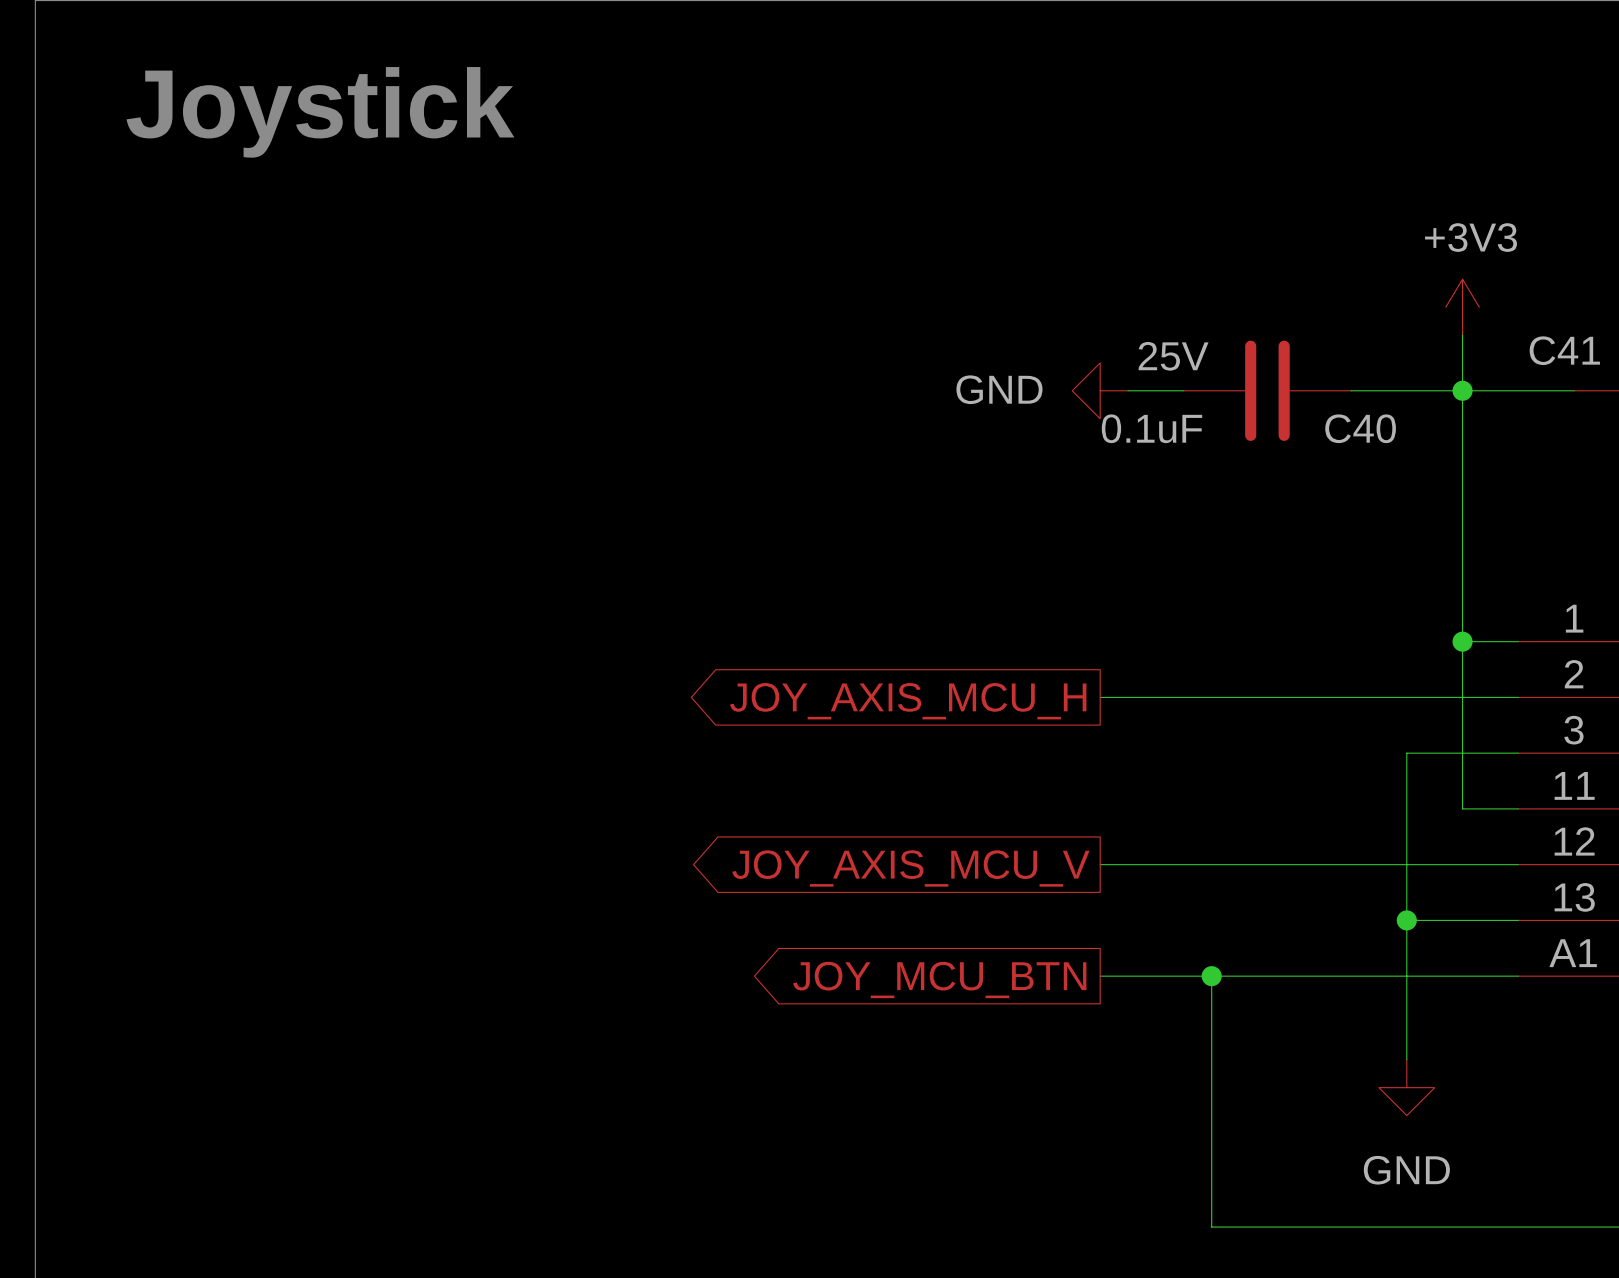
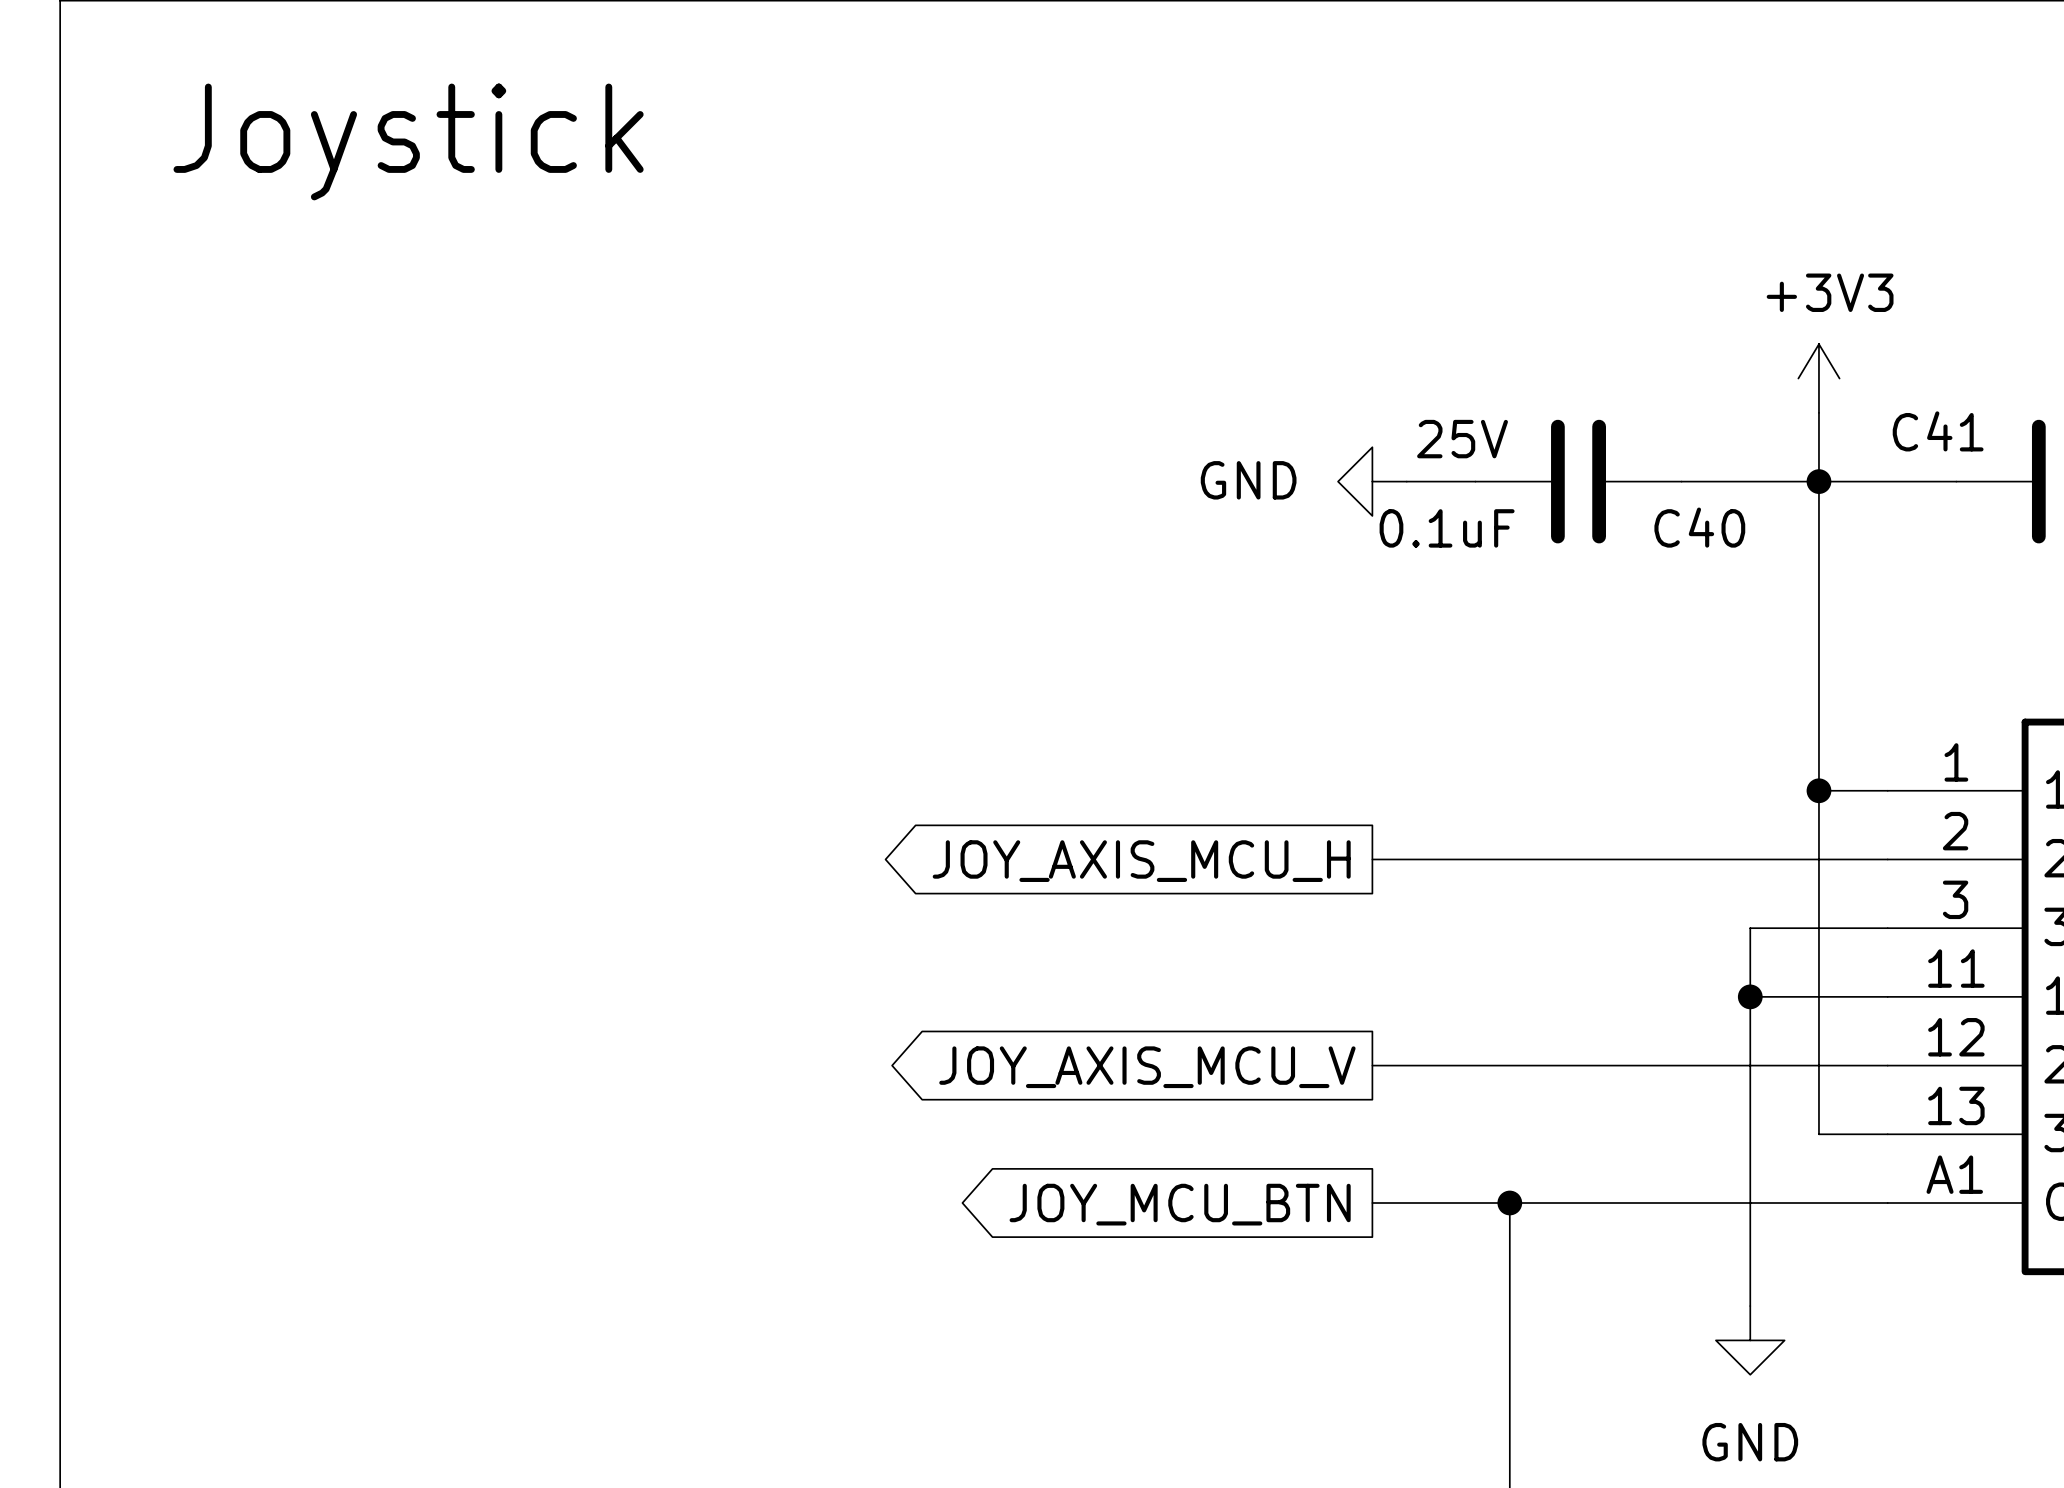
wire: (1406, 920) (1462, 920) -> (1750, 996) (1818, 996) (1818, 1134)
junction position: (1406, 920) -> (1750, 996)

